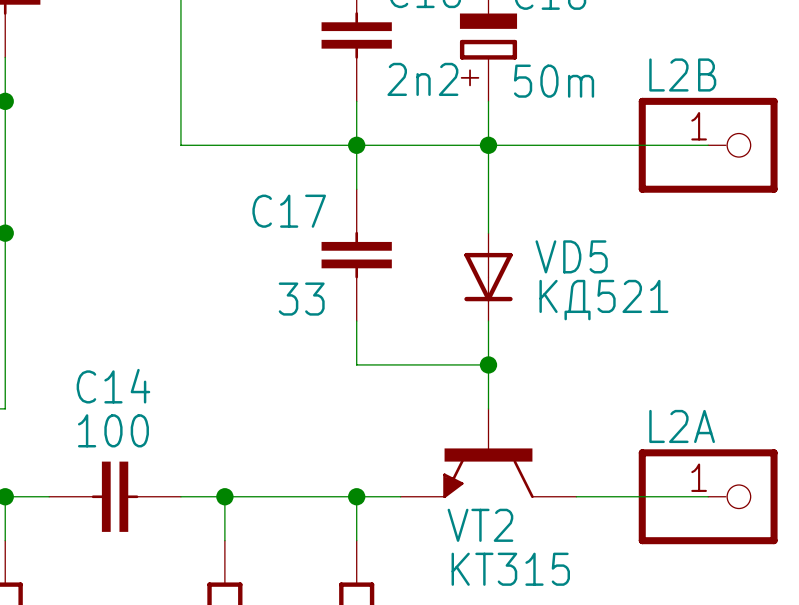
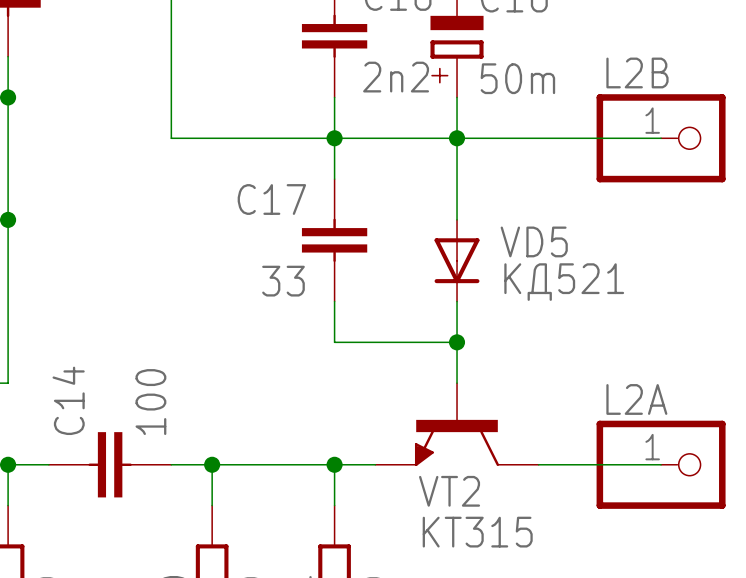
C14 name rotation: 0° (113, 386) -> 90° counterclockwise (68, 400)
C14 value rotation: 0° (113, 430) -> 90° counterclockwise (150, 402)

